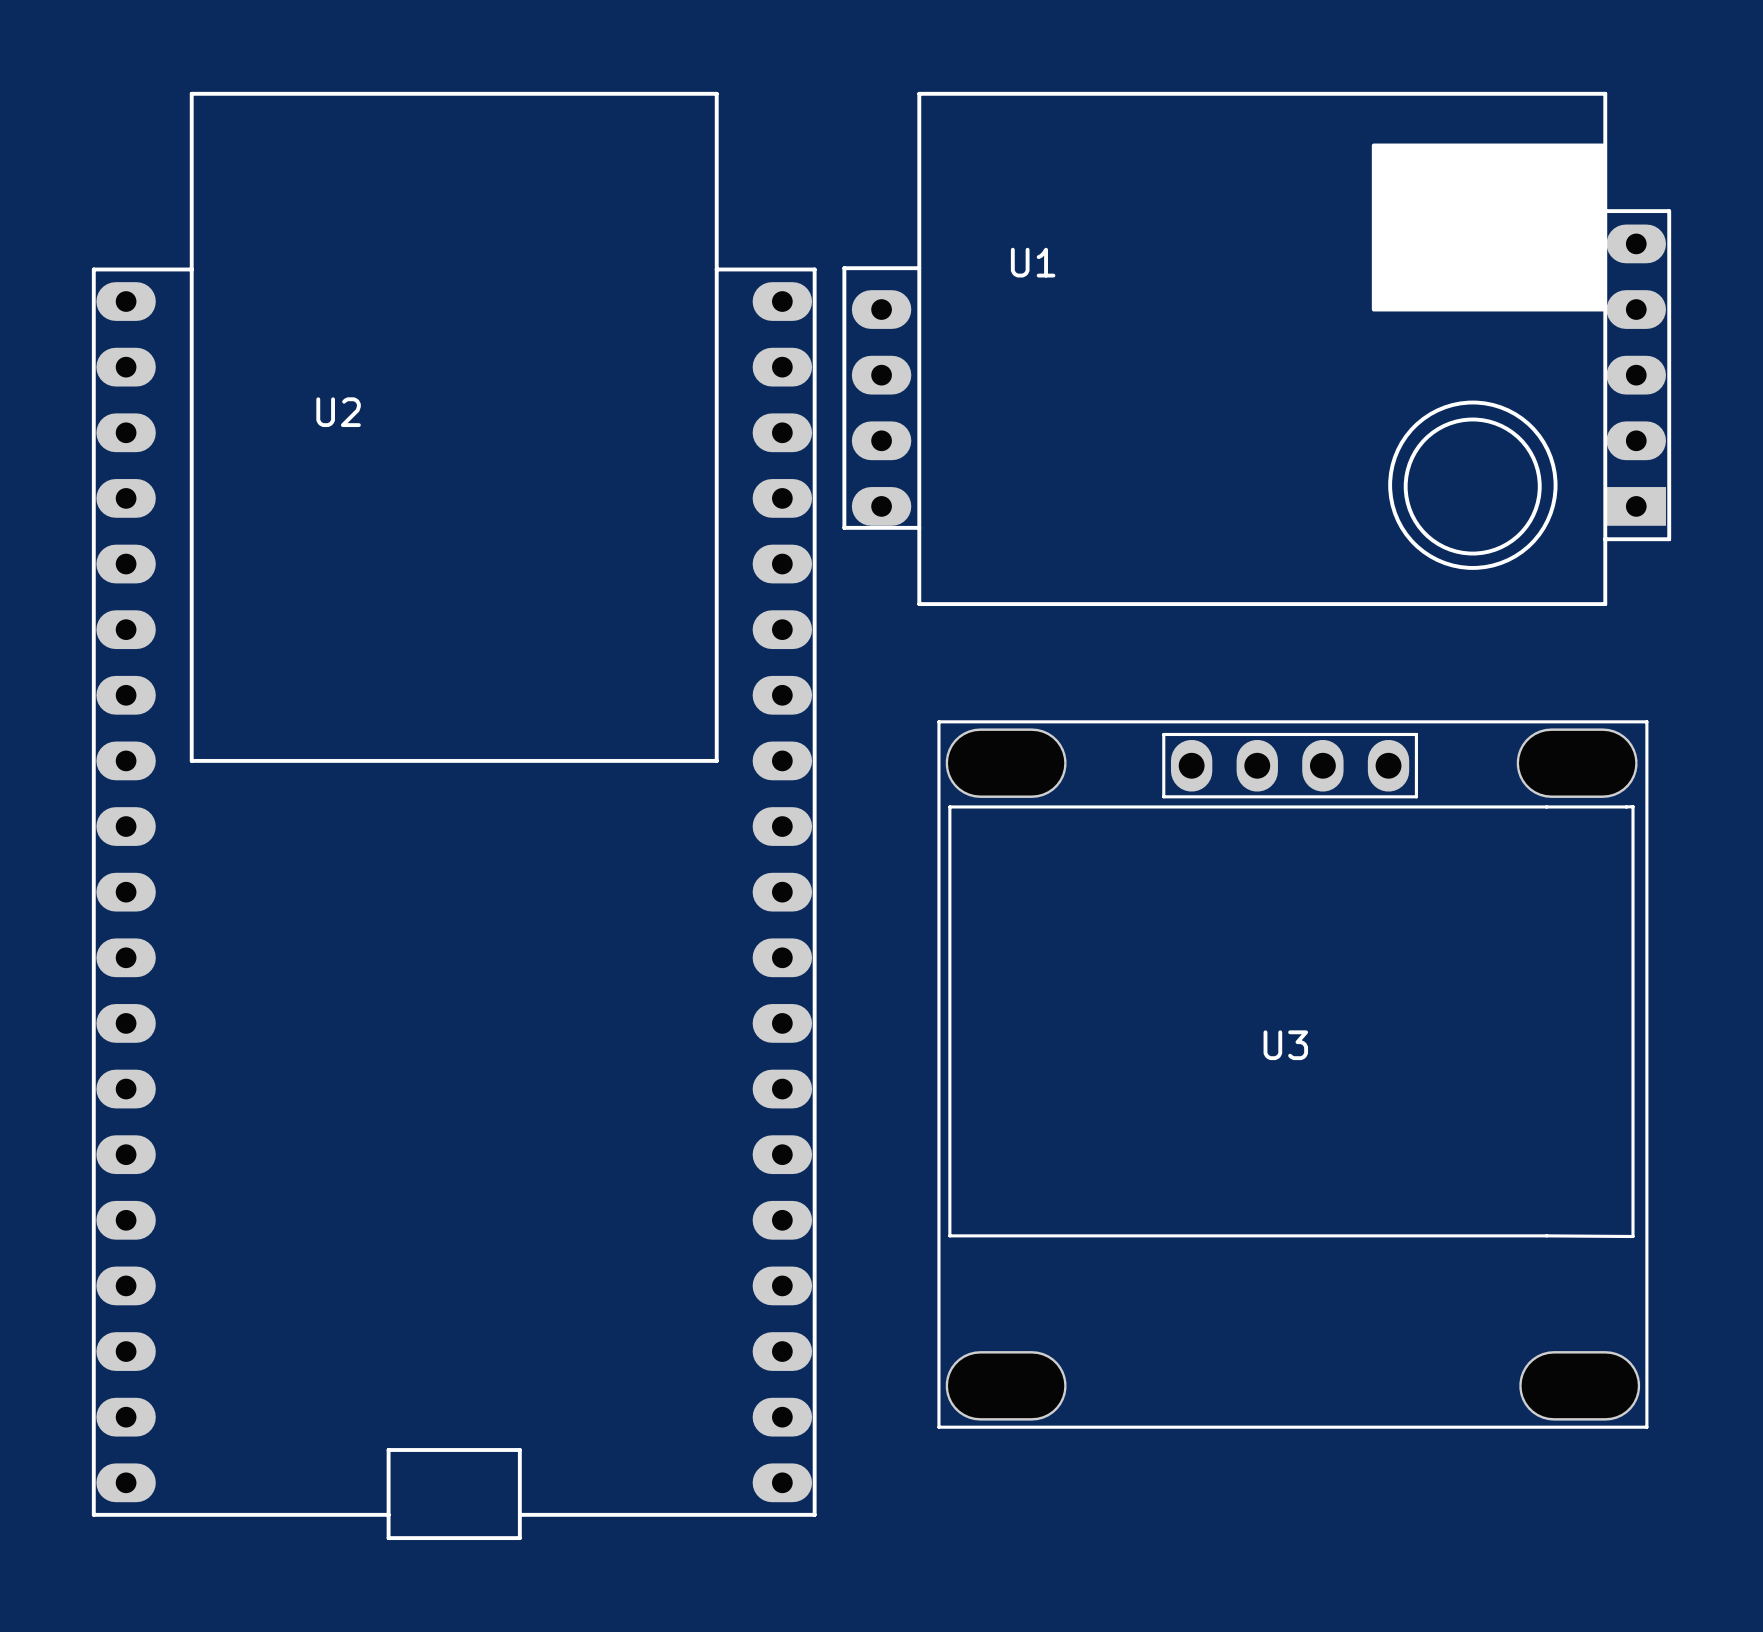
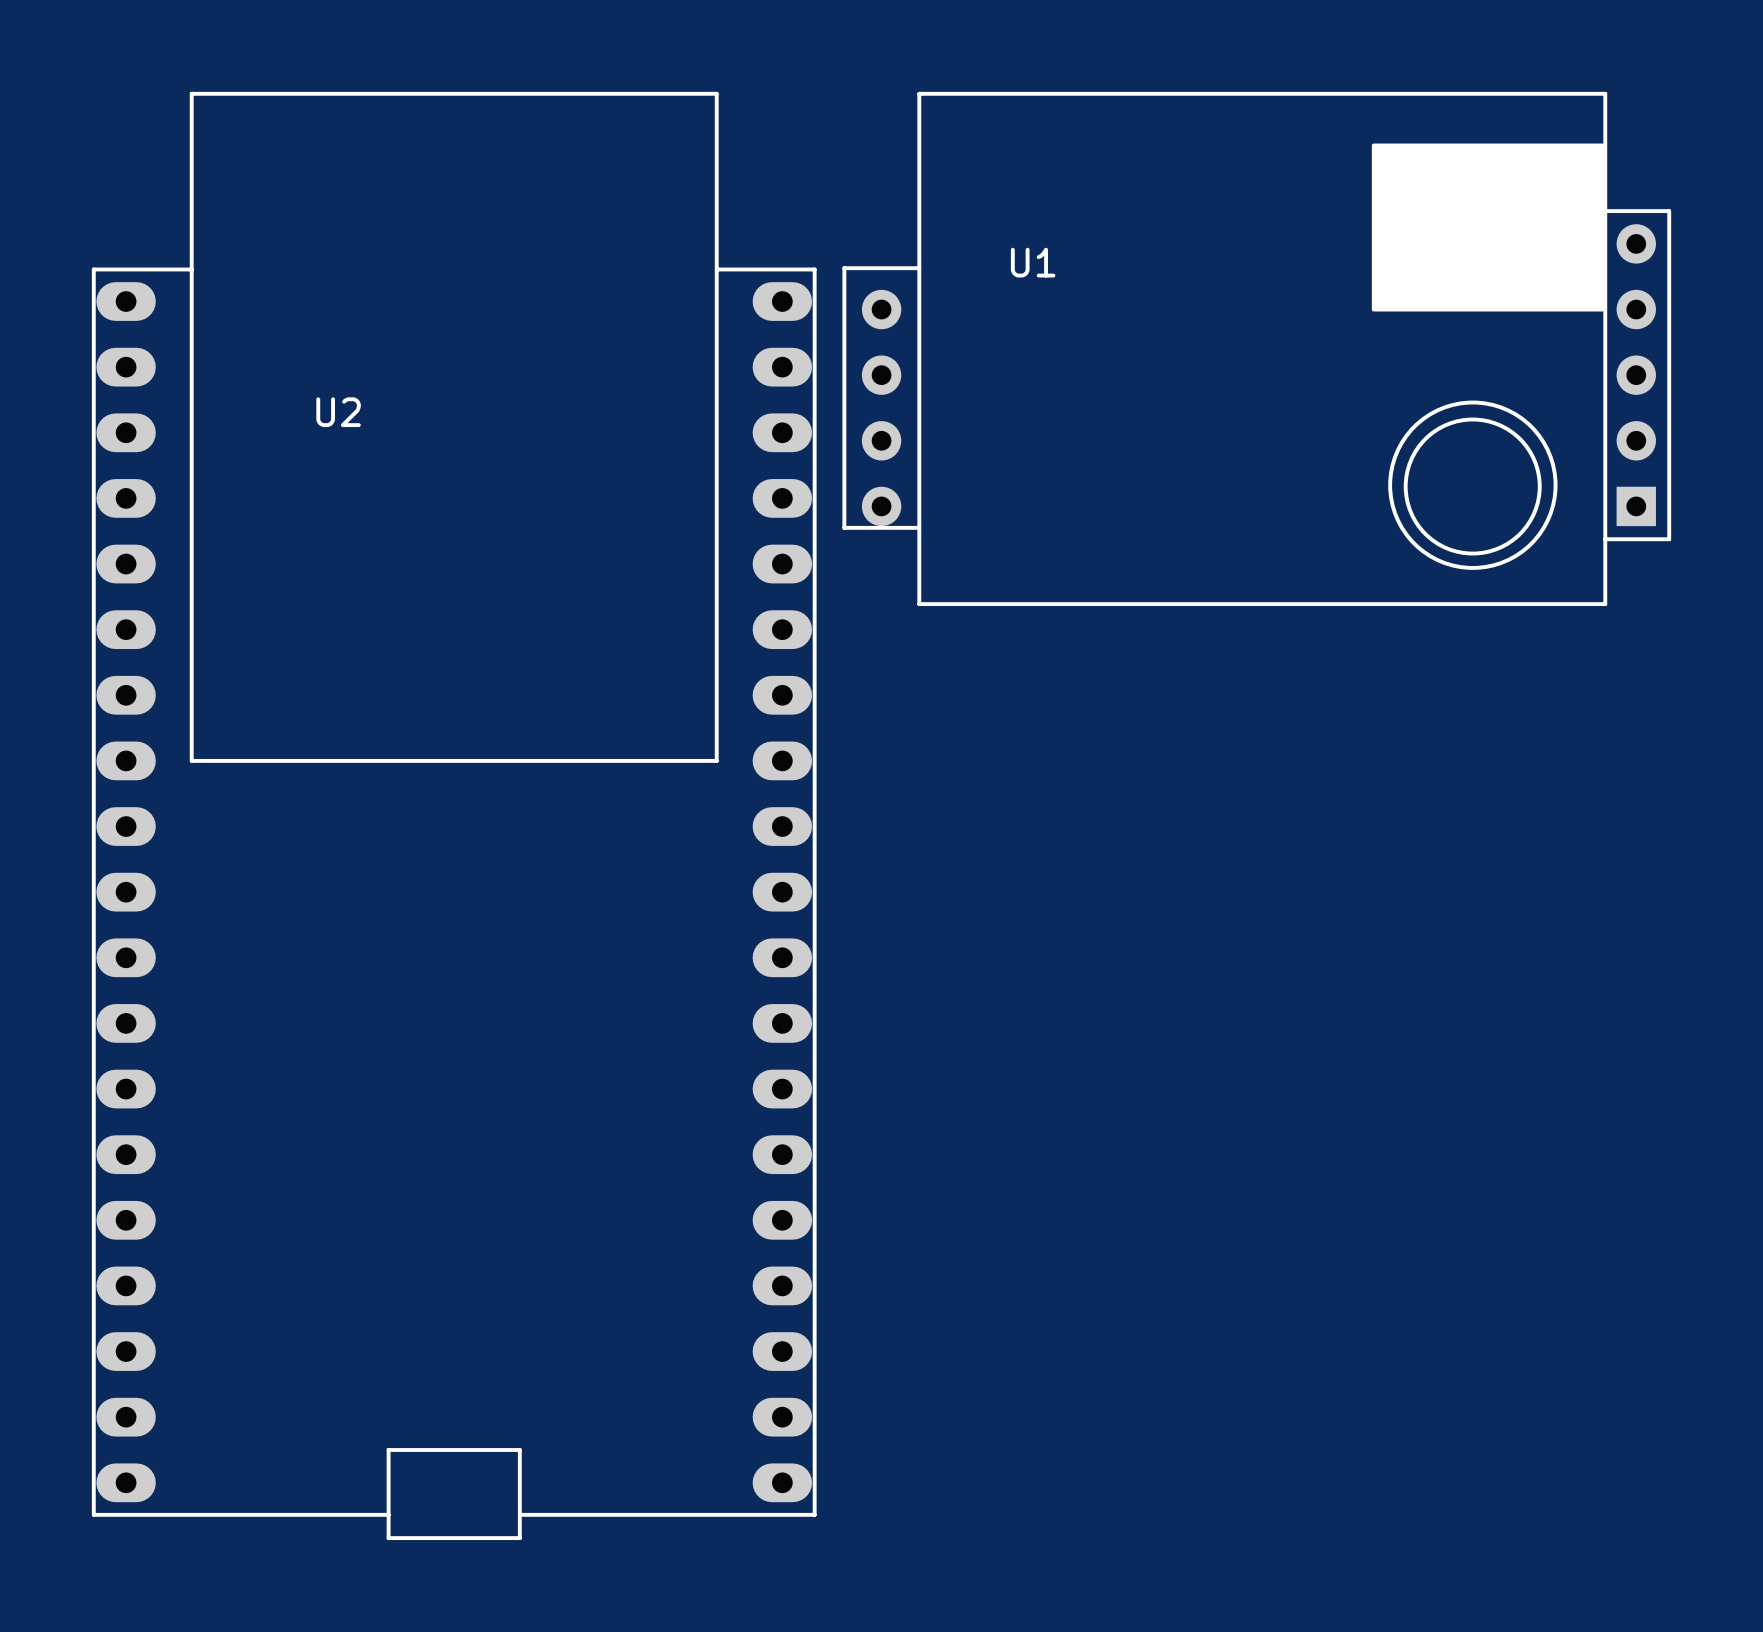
U1 footprint: [842, 91, 1672, 607] -> [842, 91, 1672, 607]
U3: (1292, 1074) -> none

